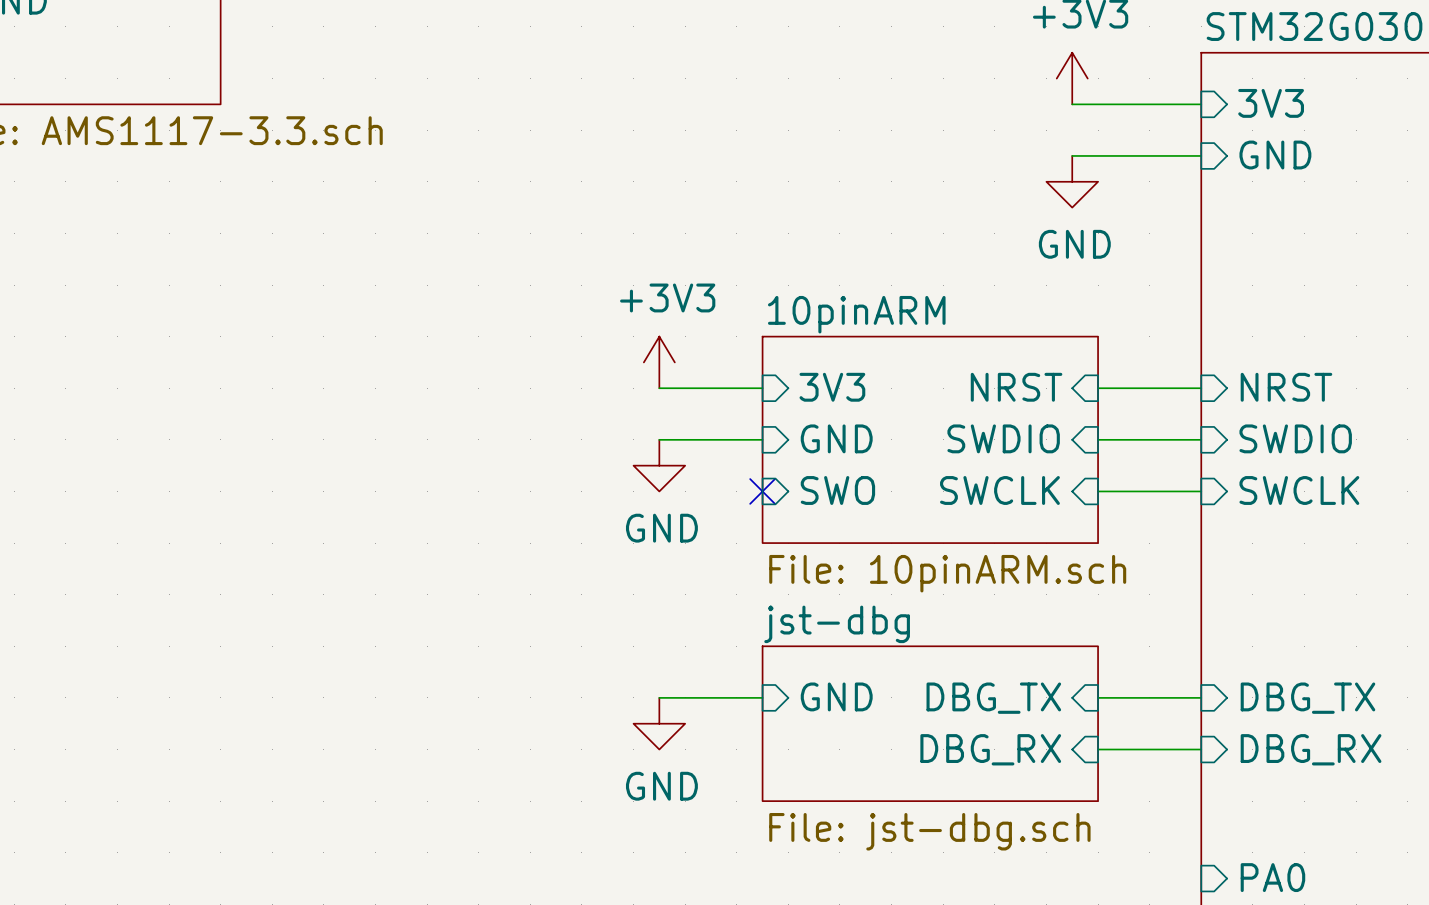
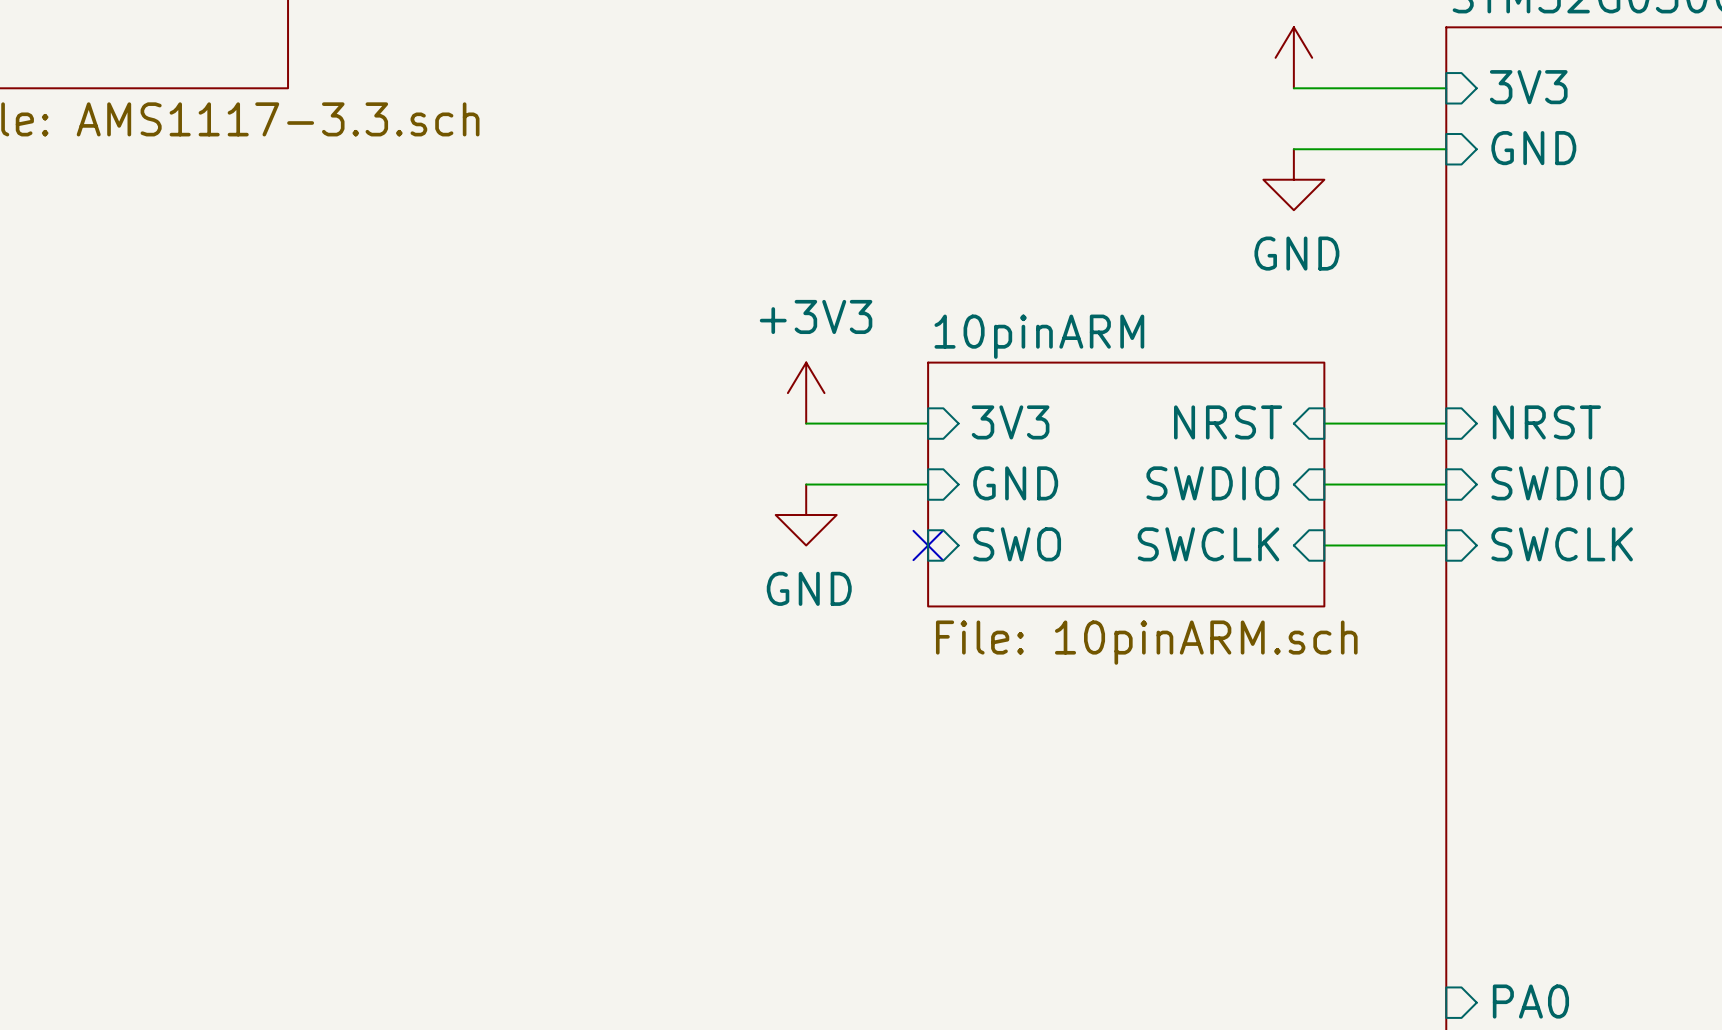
sheet pin: GND (836, 696) -> none
wire: (659, 697) (762, 697) -> none
wire: (1098, 697) (1201, 697) -> none
sheet pin: DBG_TX (993, 698) -> none
sheet pin: DBG_TX (1307, 698) -> none
power symbol: GND (659, 723) -> none
sheet jst-dbg: File: jst-dbg.sch (930, 723) -> none
sheet pin: DBG_RX (990, 749) -> none
wire: (1098, 749) (1201, 749) -> none
sheet pin: DBG_RX (1311, 749) -> none

